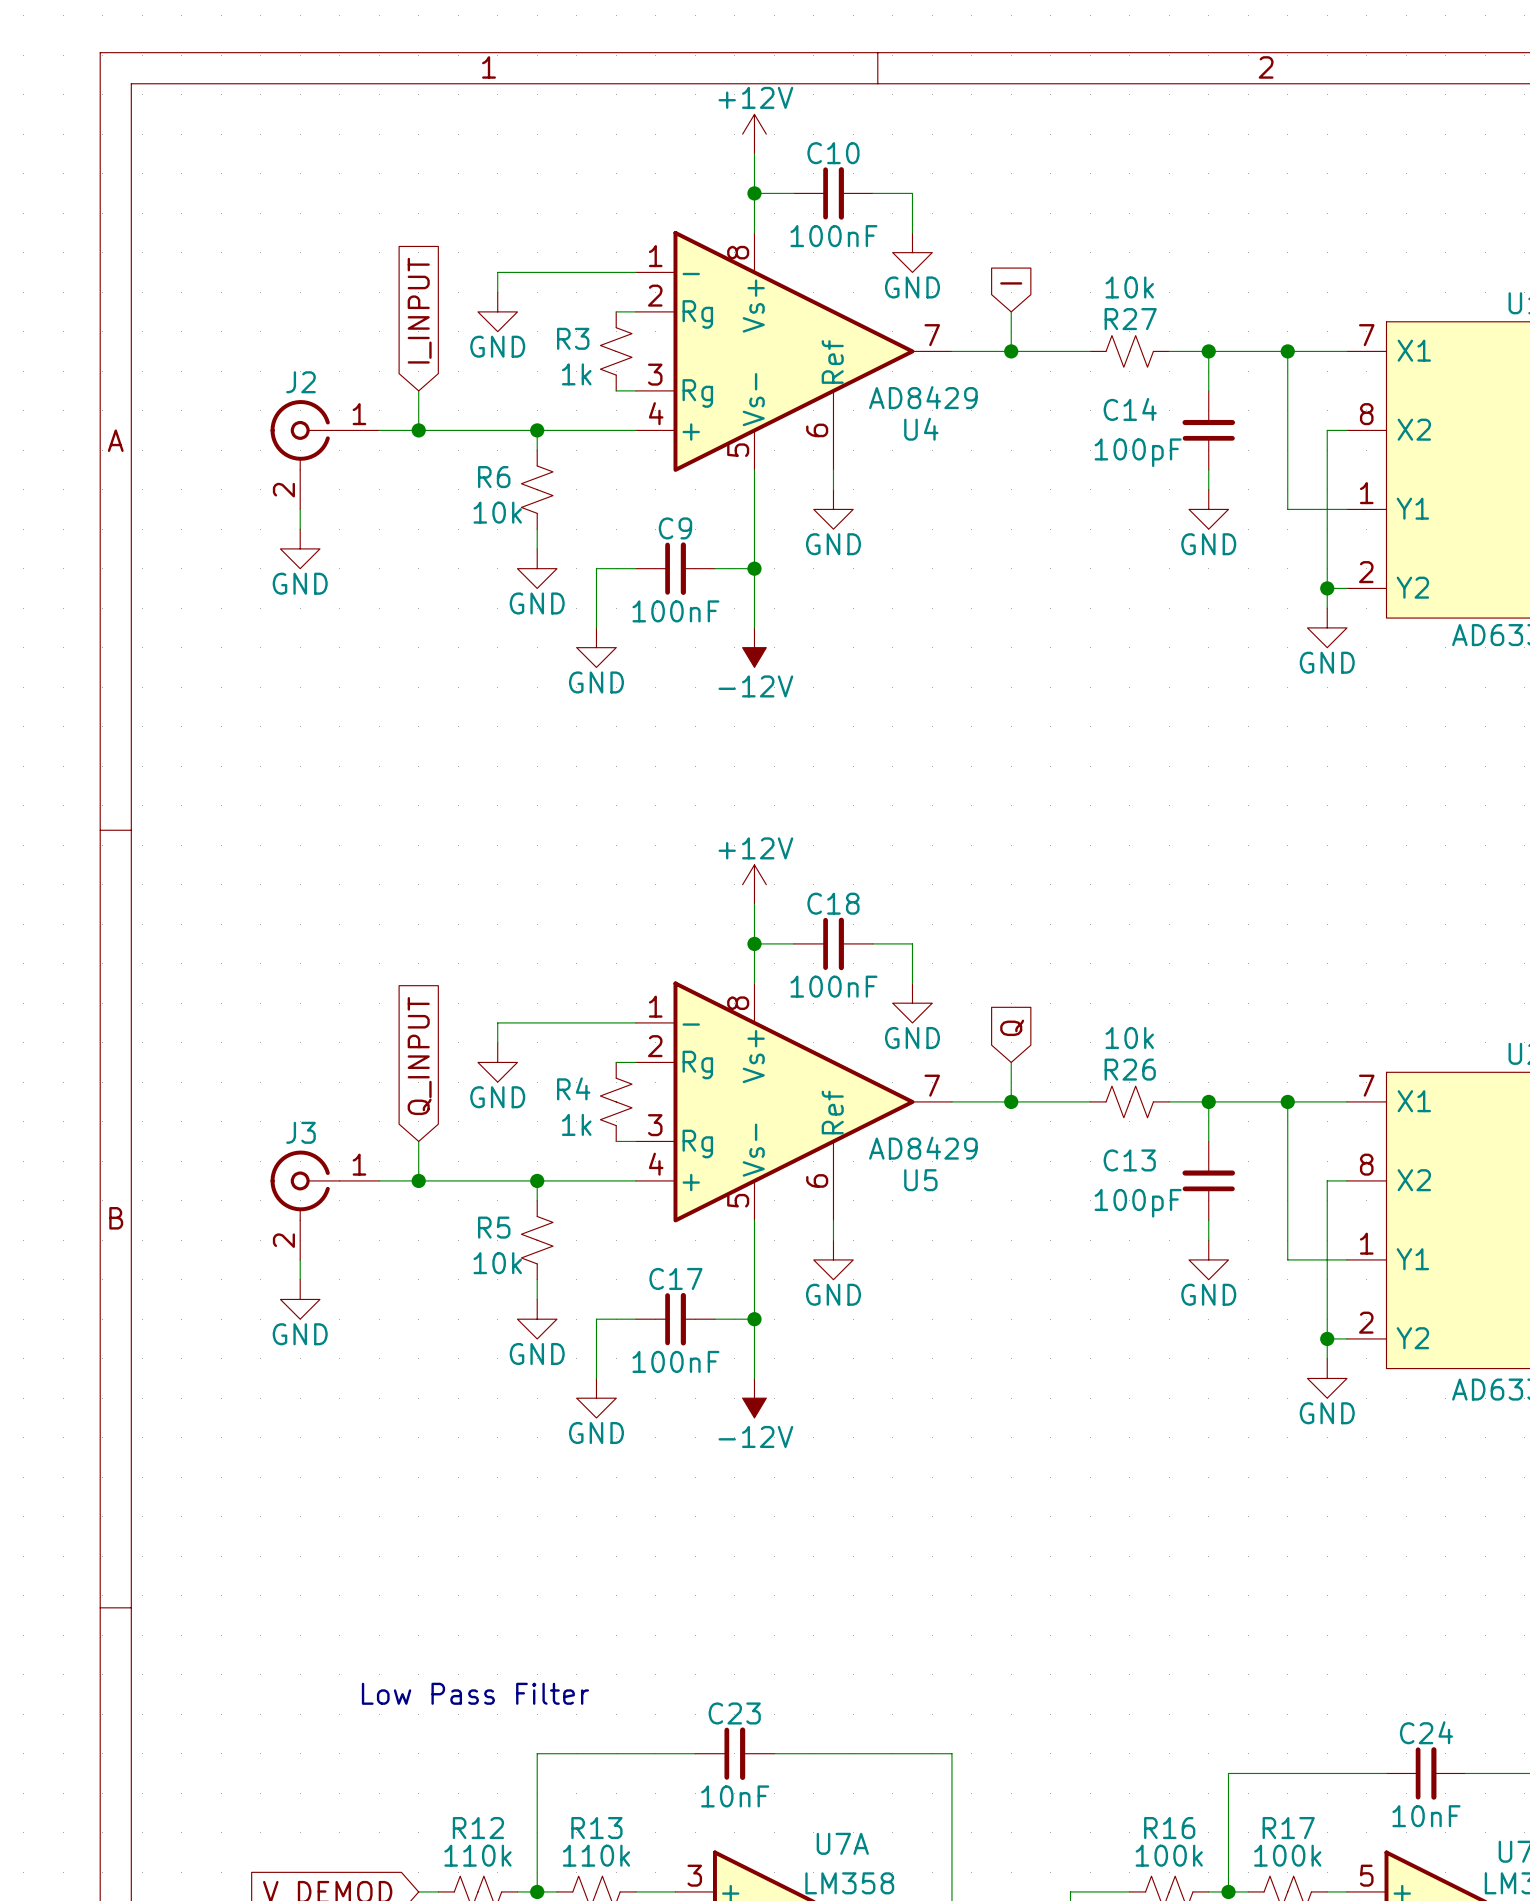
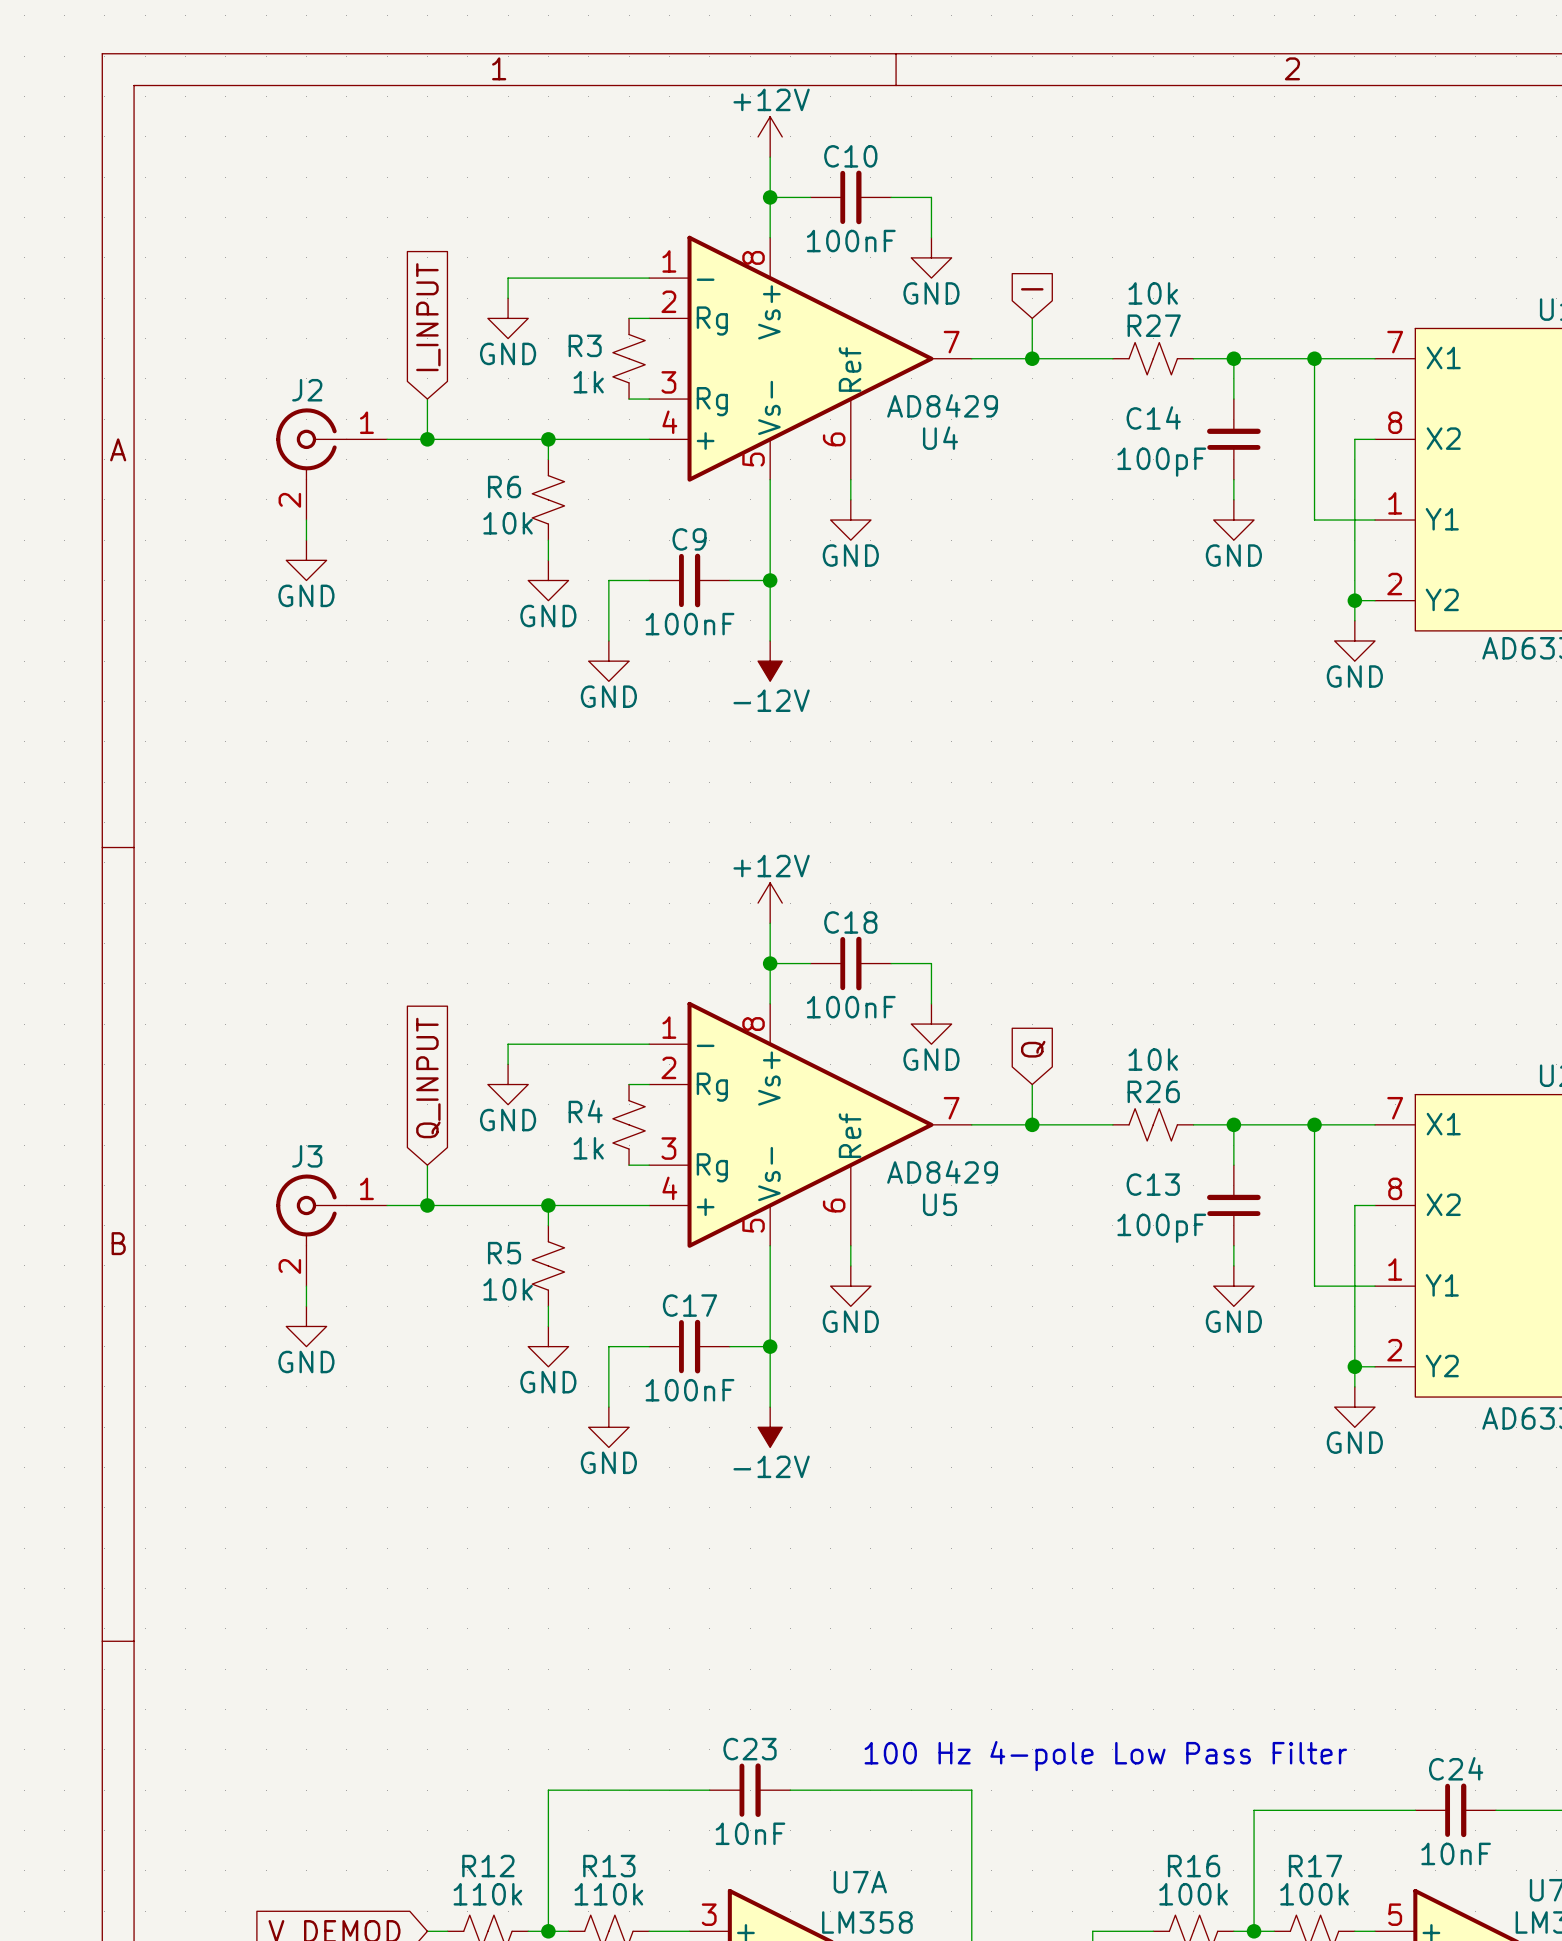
text: Low Pass Filter (475, 1693) -> none
text: none -> 100 Hz 4-pole Low Pass Filter (1105, 1756)

